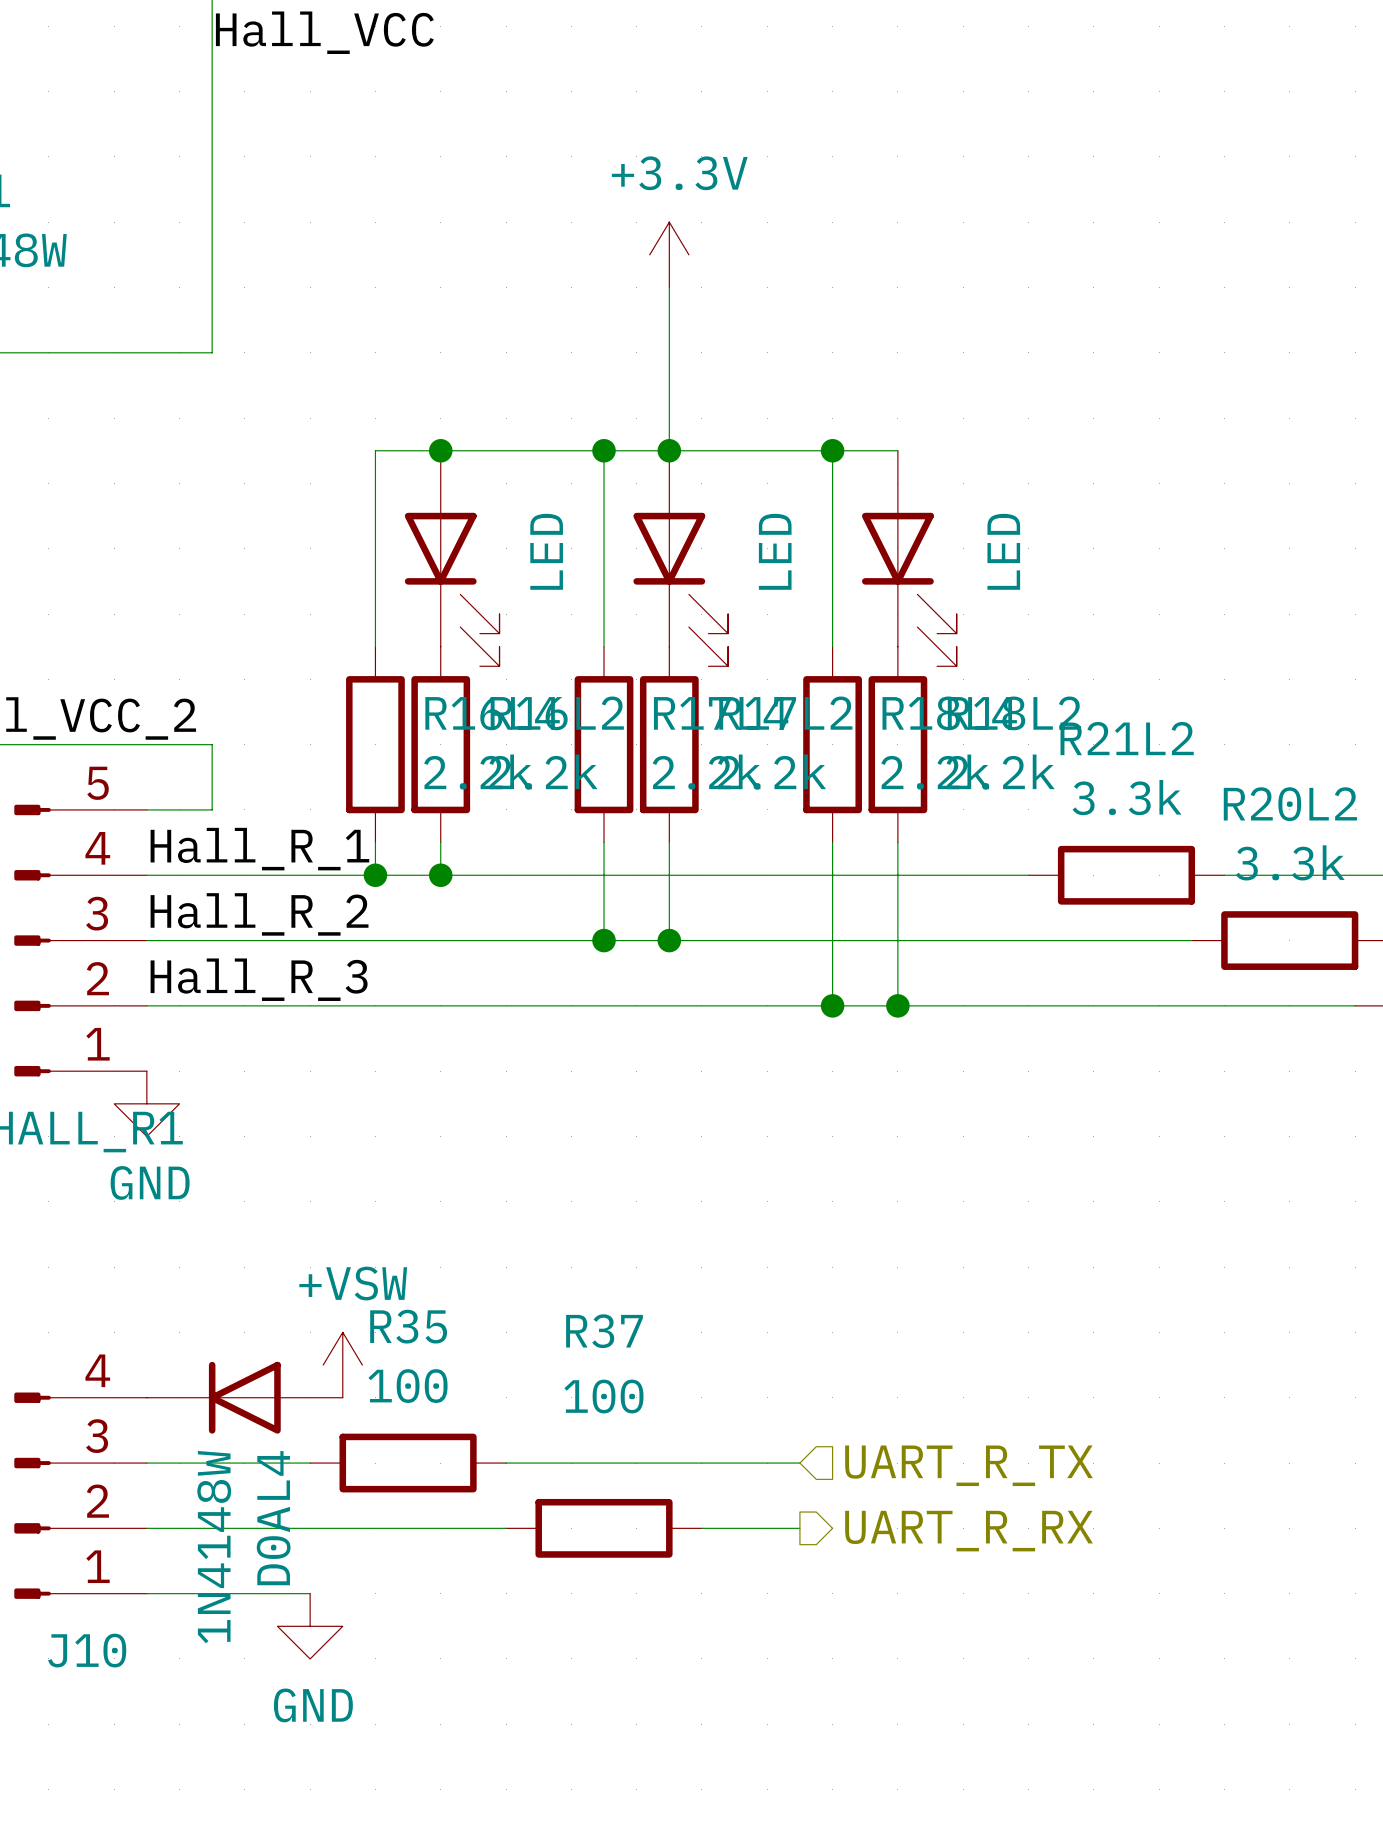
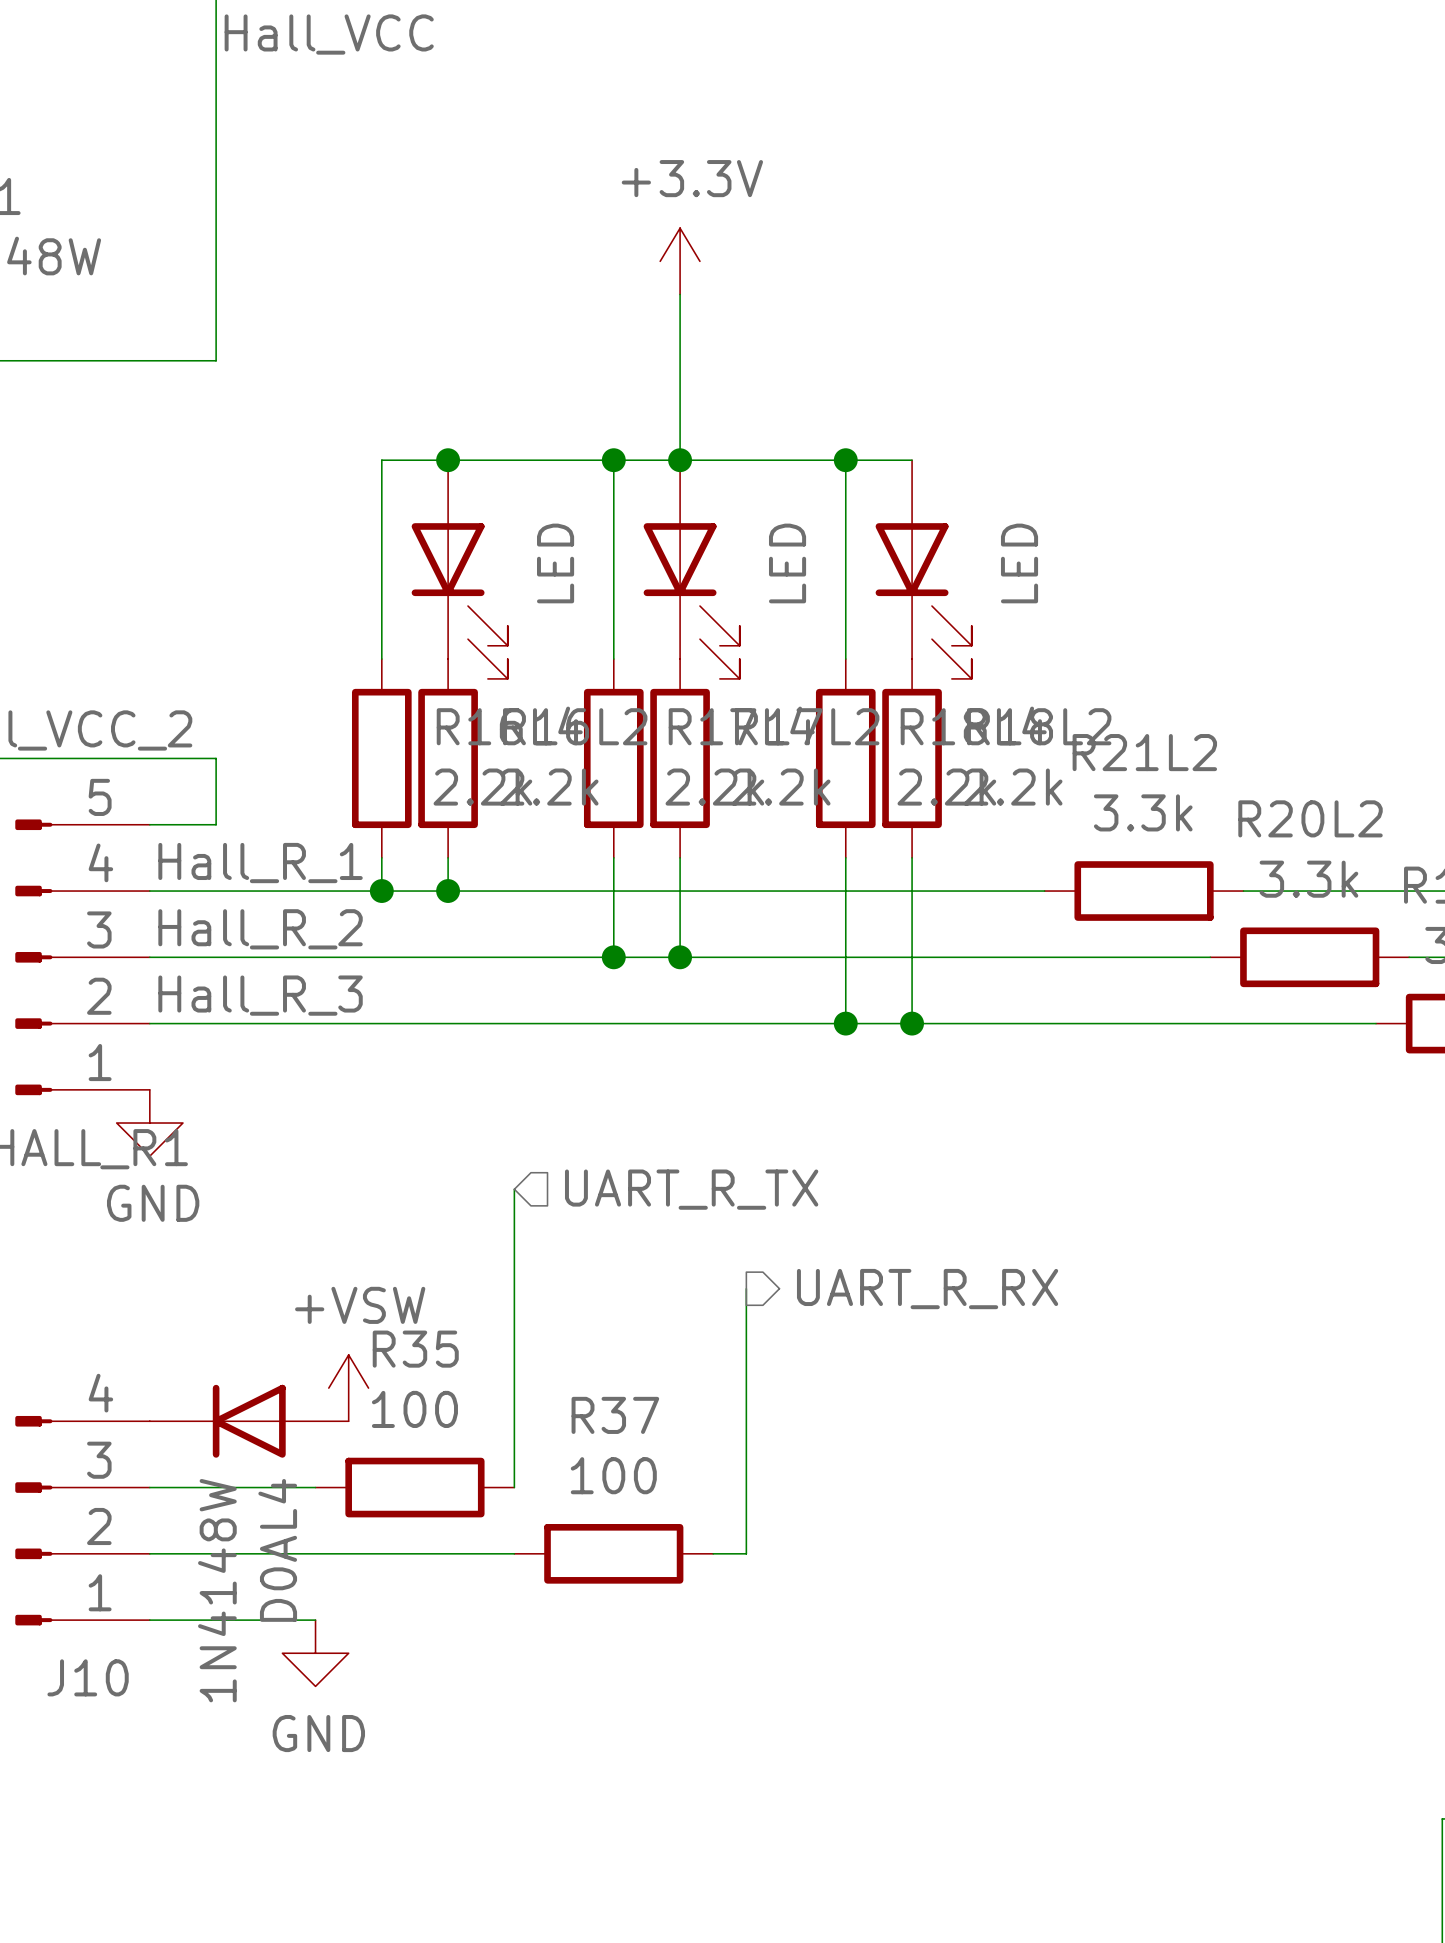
R37 name position: R37 (604, 1331) -> R37 (615, 1415)
R37 value position: 100 (603, 1396) -> 100 (613, 1475)
wire: (506, 1463) (799, 1463) -> (514, 1487) (514, 1189)
hierarchical label position: UART_R_TX (969, 1465) -> UART_R_TX (691, 1189)
wire: (734, 1528) (799, 1528) -> (746, 1553) (746, 1288)
hierarchical label position: UART_R_RX (969, 1531) -> UART_R_RX (927, 1289)

